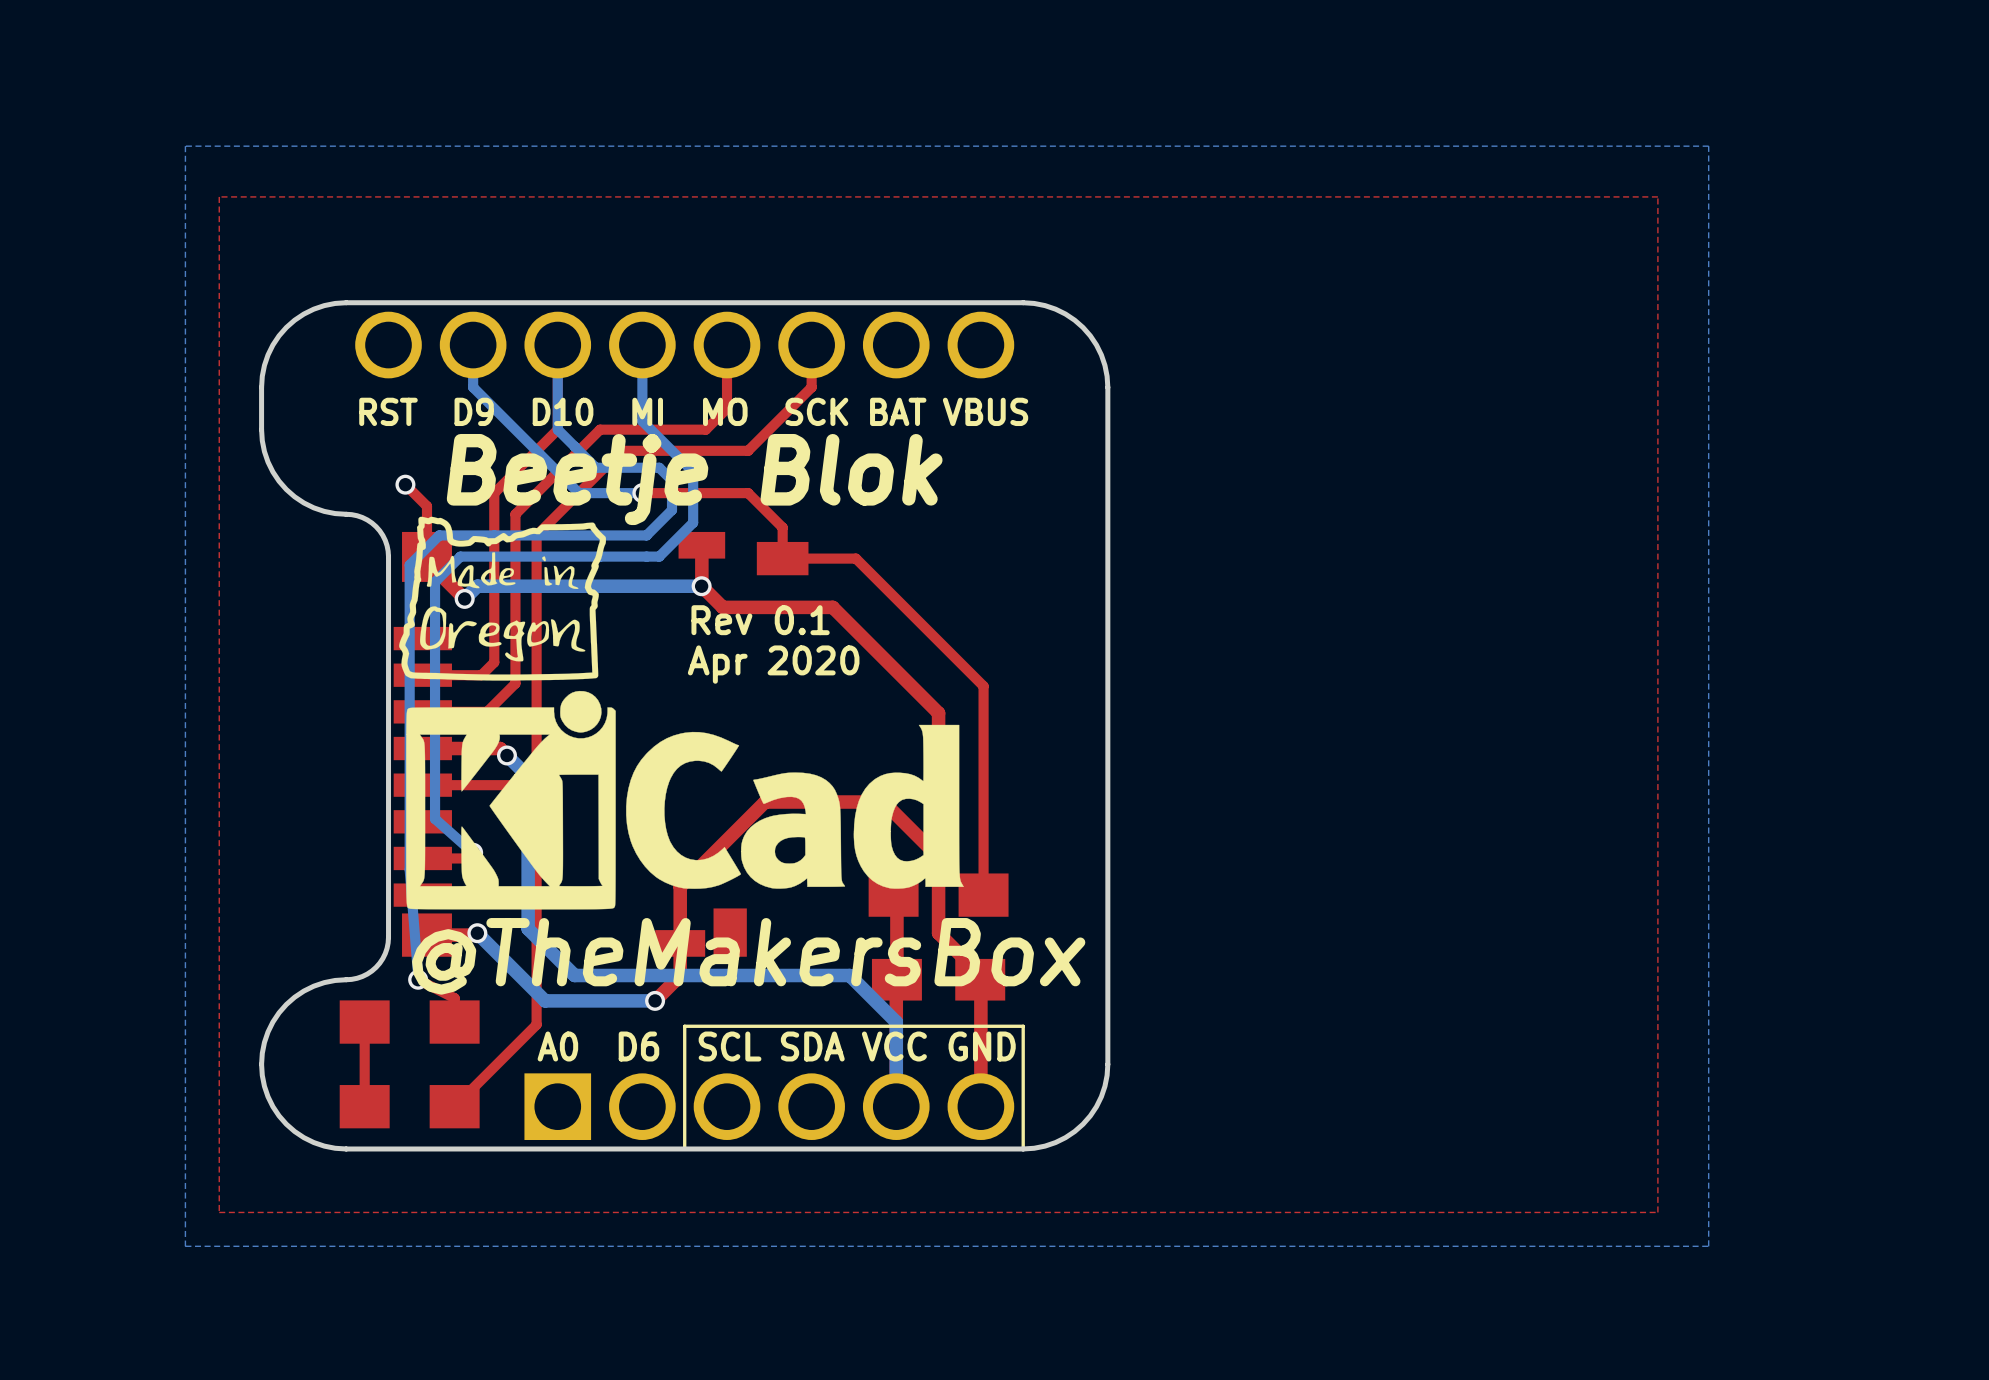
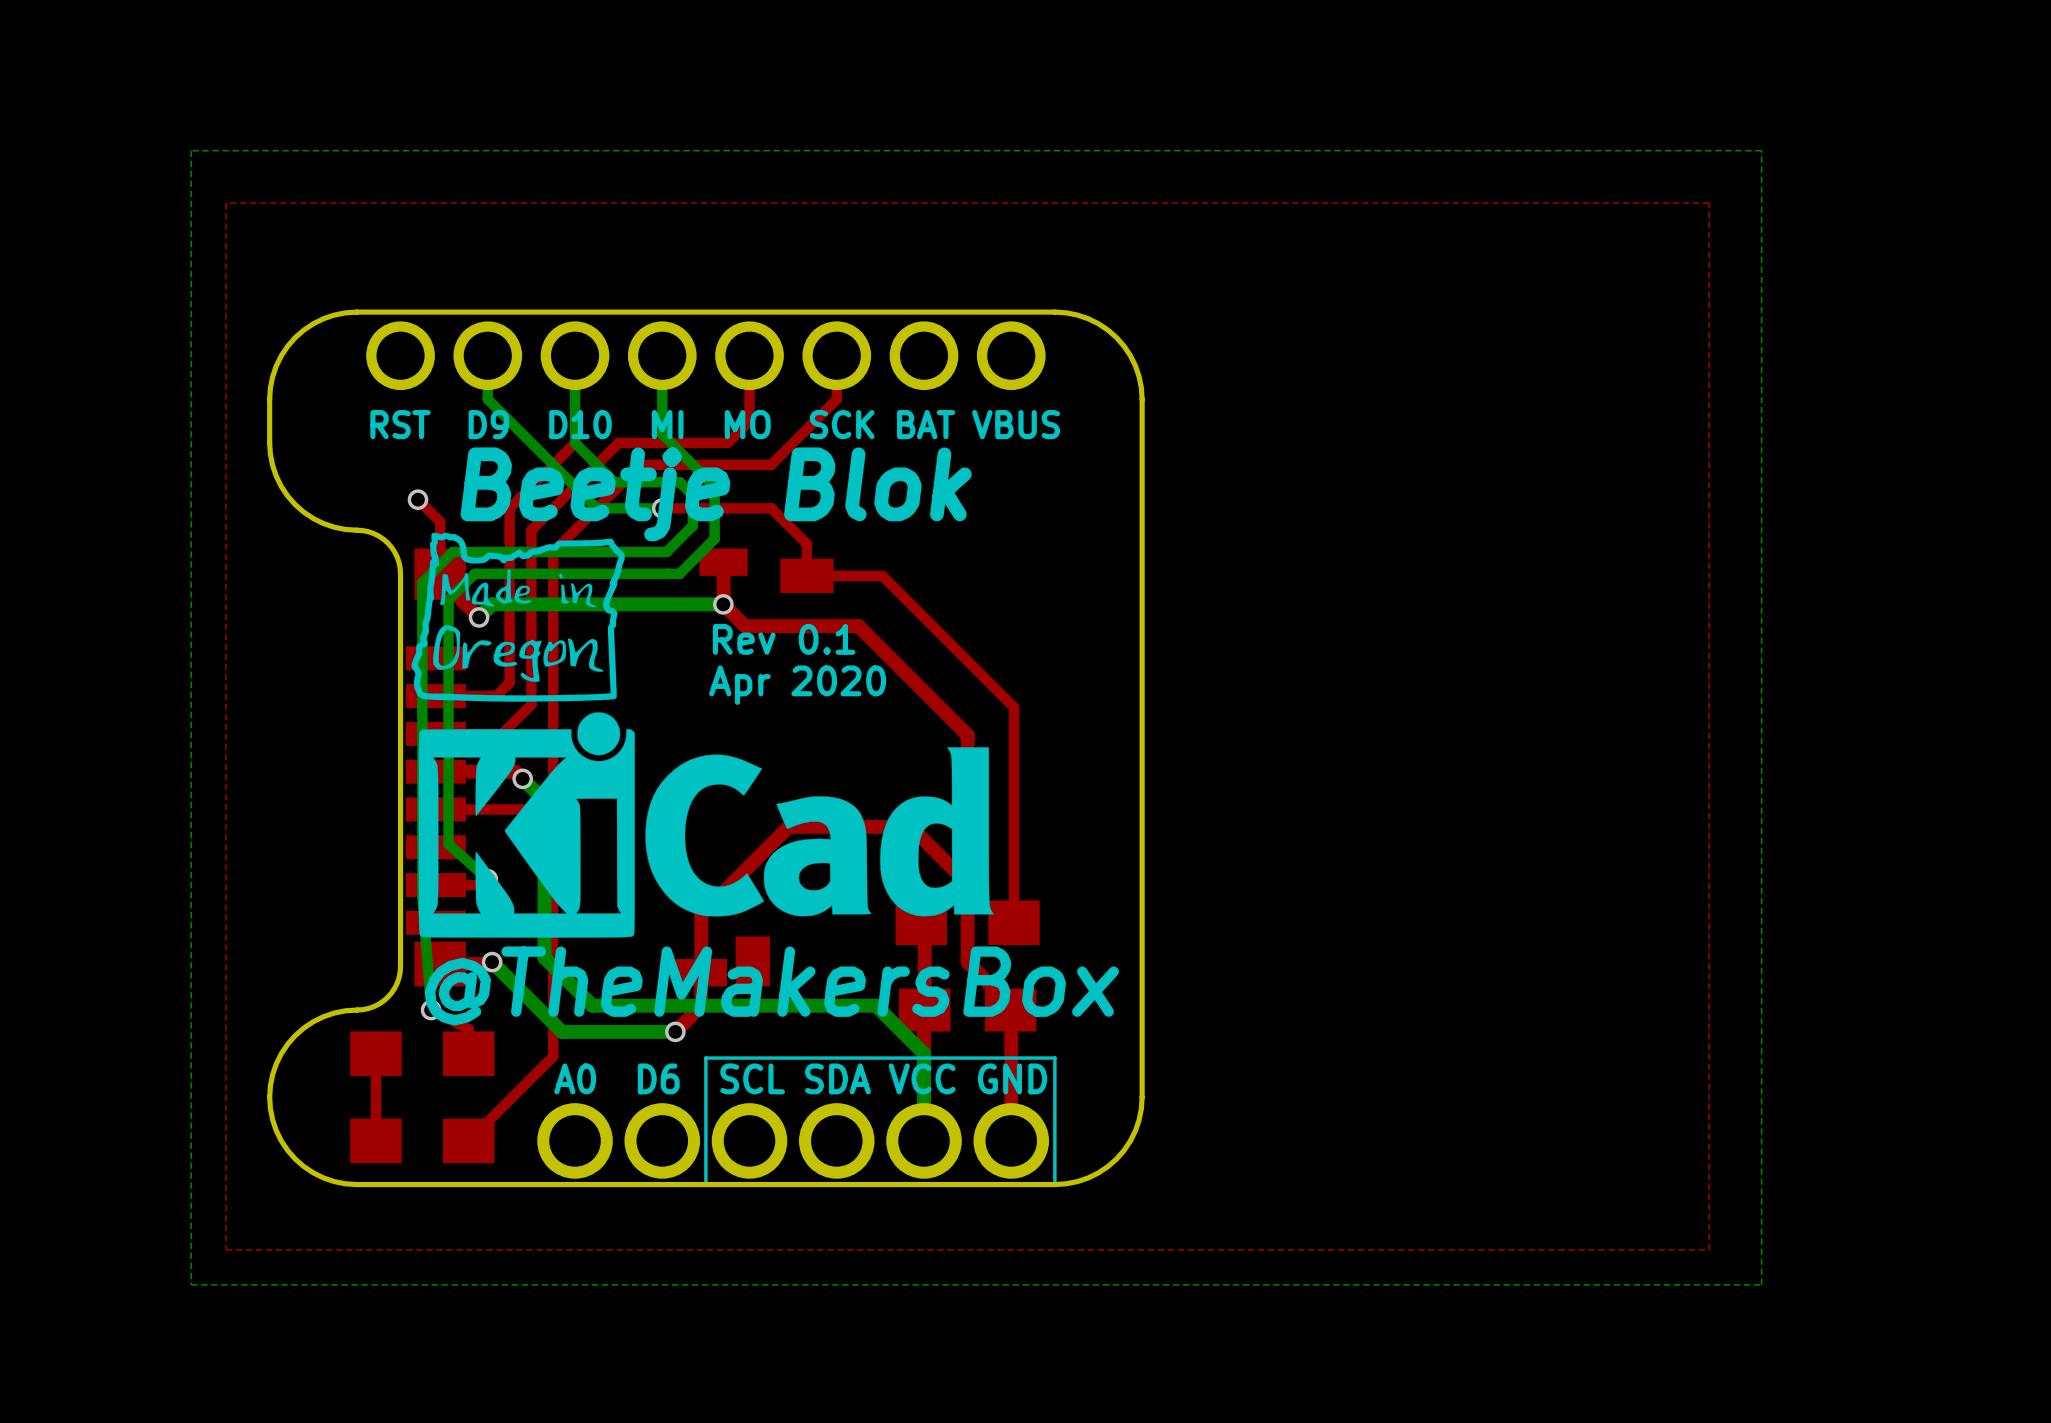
part footprint: [524, 1024, 1025, 1151] -> [537, 1056, 1057, 1187]

